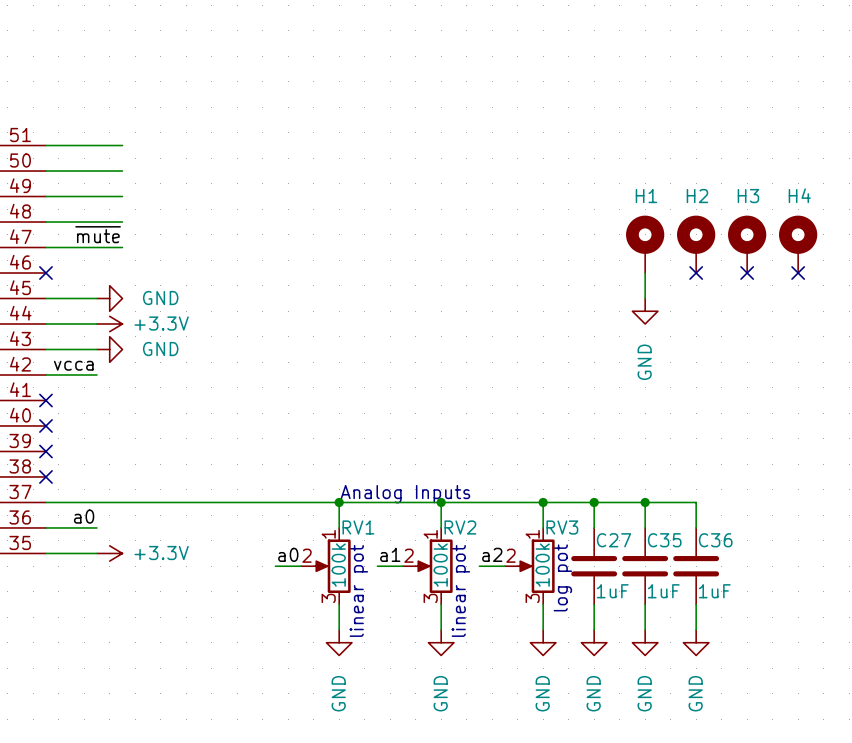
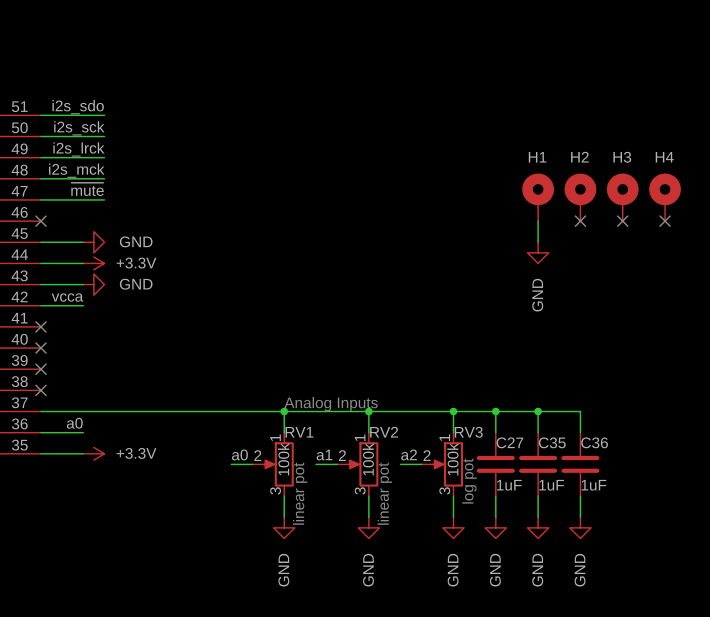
label: none -> i2s_sdo (78, 107)
label: none -> i2s_sck (79, 128)
label: none -> i2s_lrck (78, 149)
label: none -> i2s_mck (76, 170)

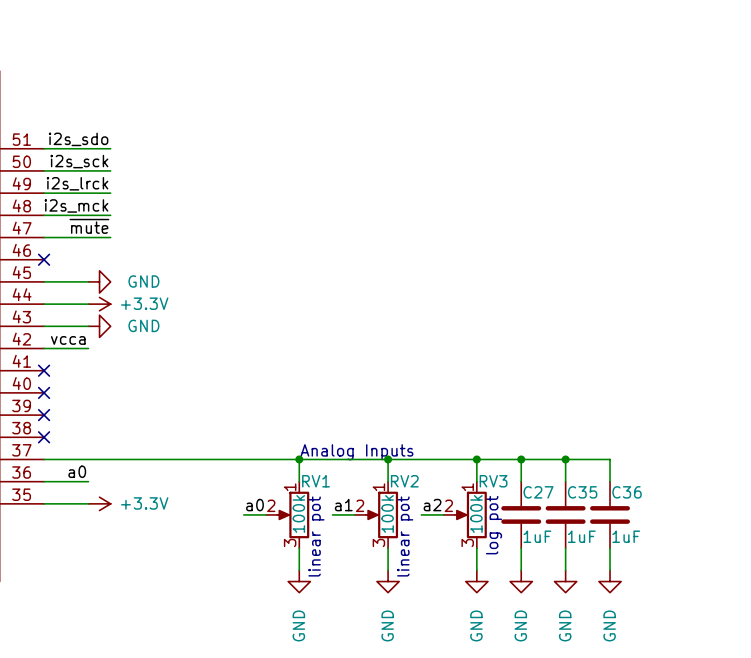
H1: (538, 197) -> none
H2: (580, 197) -> none
H3: (622, 197) -> none
H4: (665, 197) -> none
wire: (538, 221) (538, 242) -> none
no-connect mark: (580, 221) -> none
no-connect mark: (622, 221) -> none
no-connect mark: (665, 221) -> none
power symbol: GND (538, 252) -> none

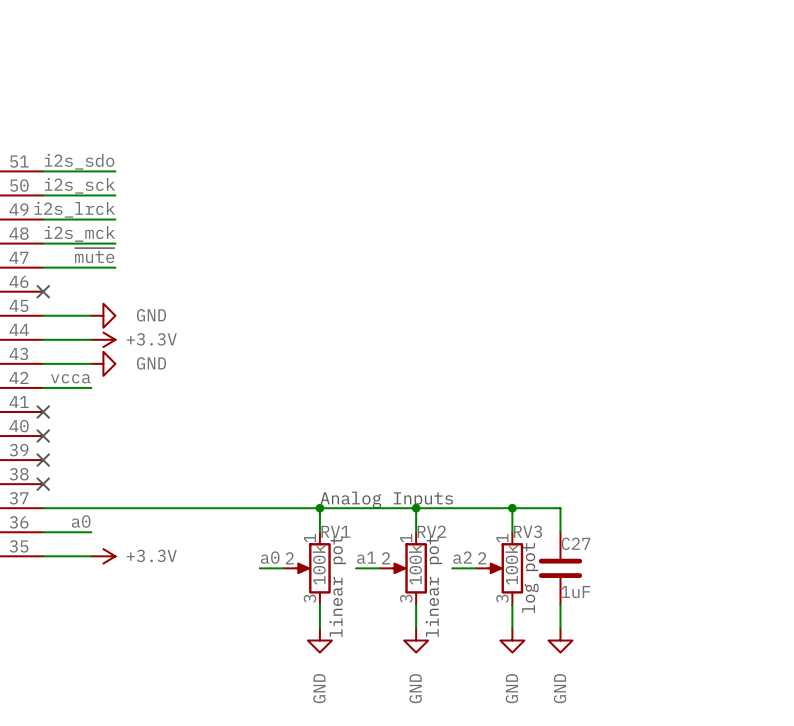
wire: (521, 459) (610, 459) (610, 481) -> none
junction: (521, 459) -> none
wire: (565, 459) (565, 481) -> none
junction: (565, 459) -> none
C35: 1uF (565, 514) -> none
C36: 1uF (610, 514) -> none
wire: (565, 548) (565, 570) -> none
wire: (610, 548) (610, 570) -> none
power symbol: GND (565, 581) -> none
power symbol: GND (610, 581) -> none

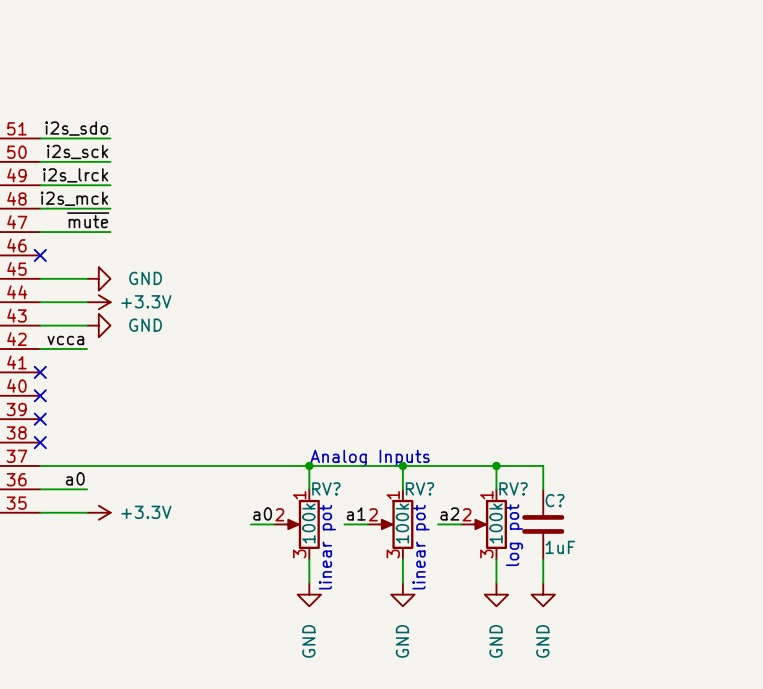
RV1 name: RV1 (335, 531) -> RV? (326, 488)
RV2 name: RV2 (431, 531) -> RV? (419, 488)
RV3 name: RV3 (527, 531) -> RV? (513, 488)
C27 name: C27 (576, 543) -> C? (555, 500)

